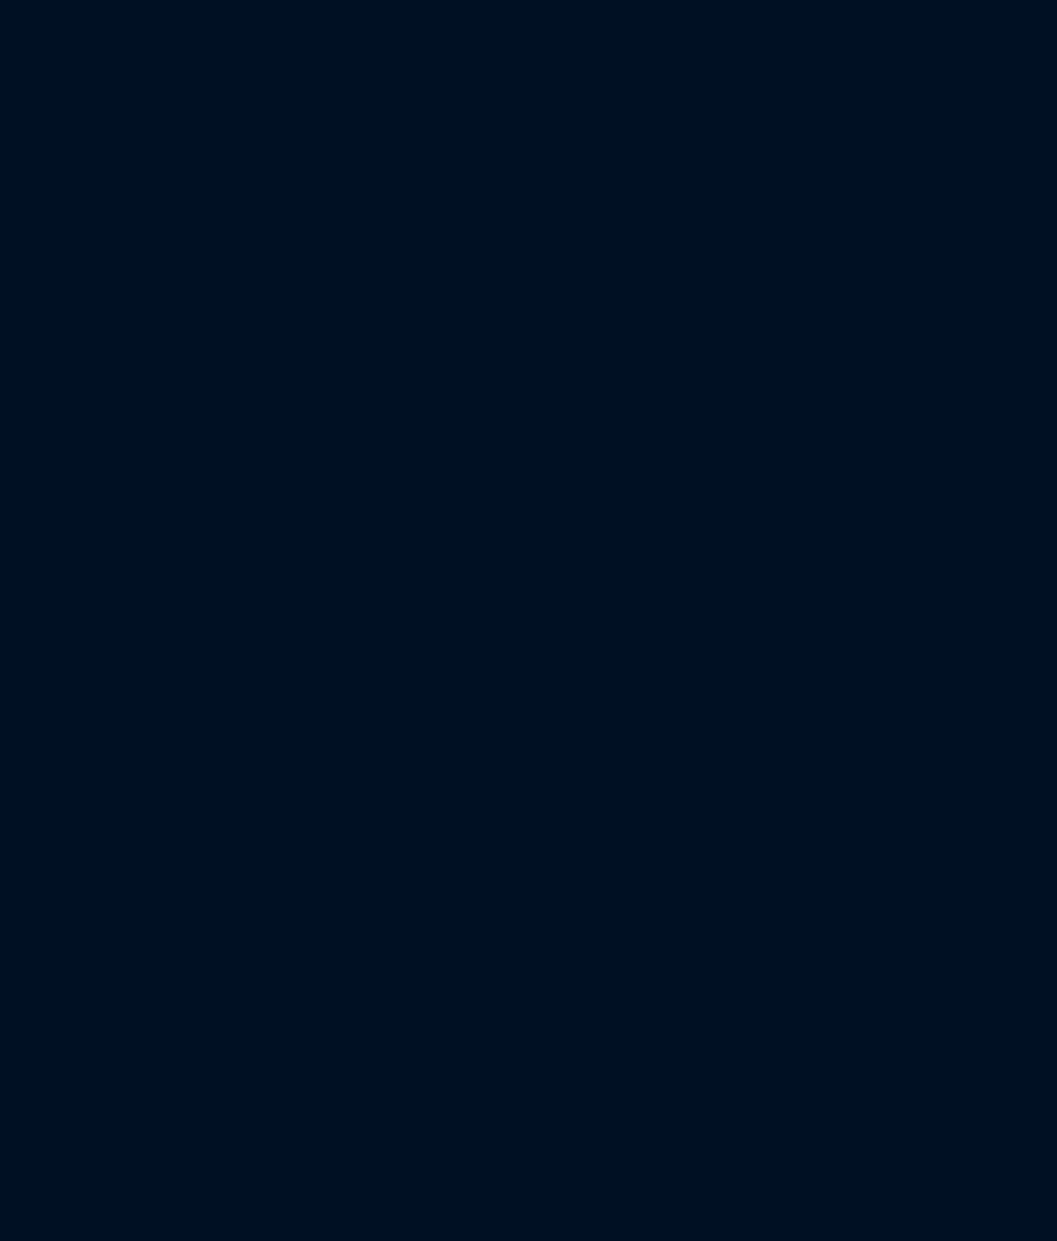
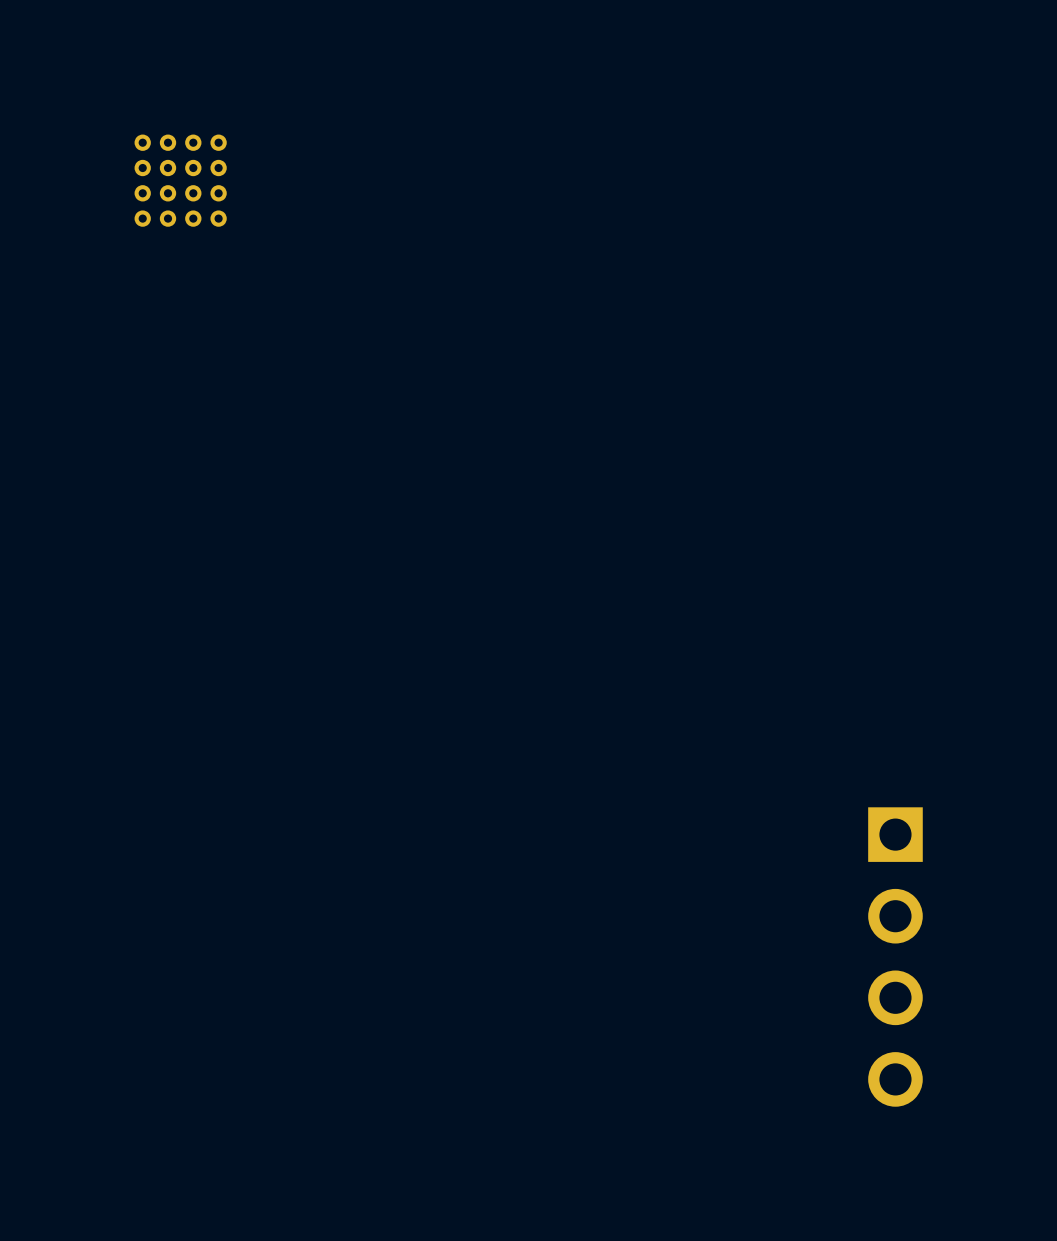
part: none -> (180, 180)
part: none -> (895, 957)

